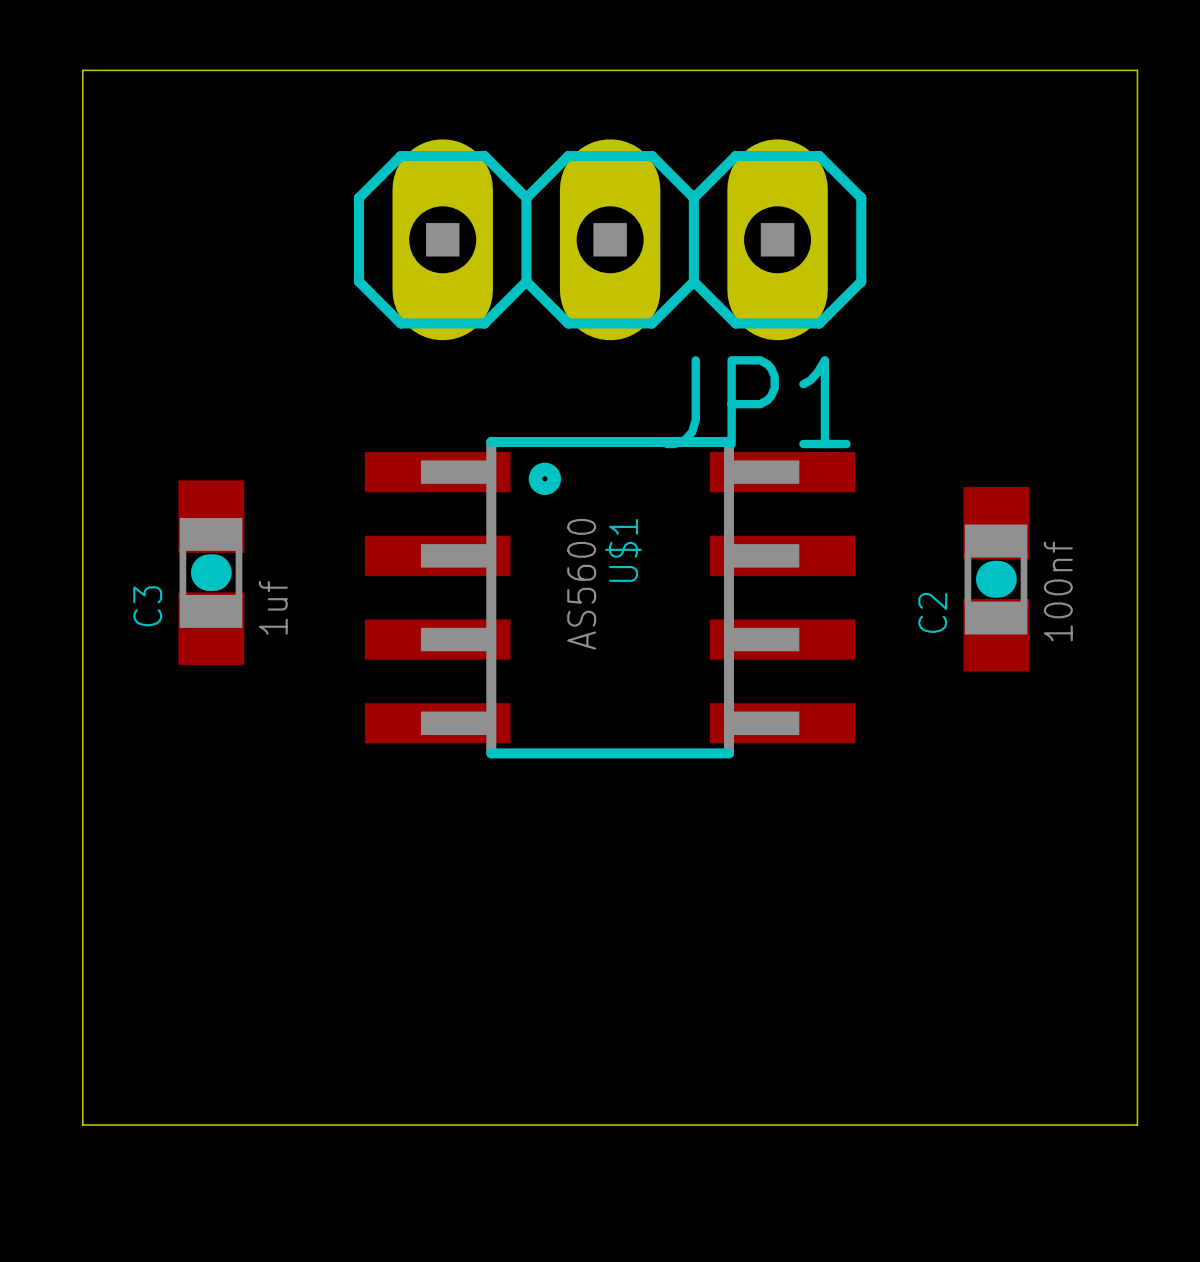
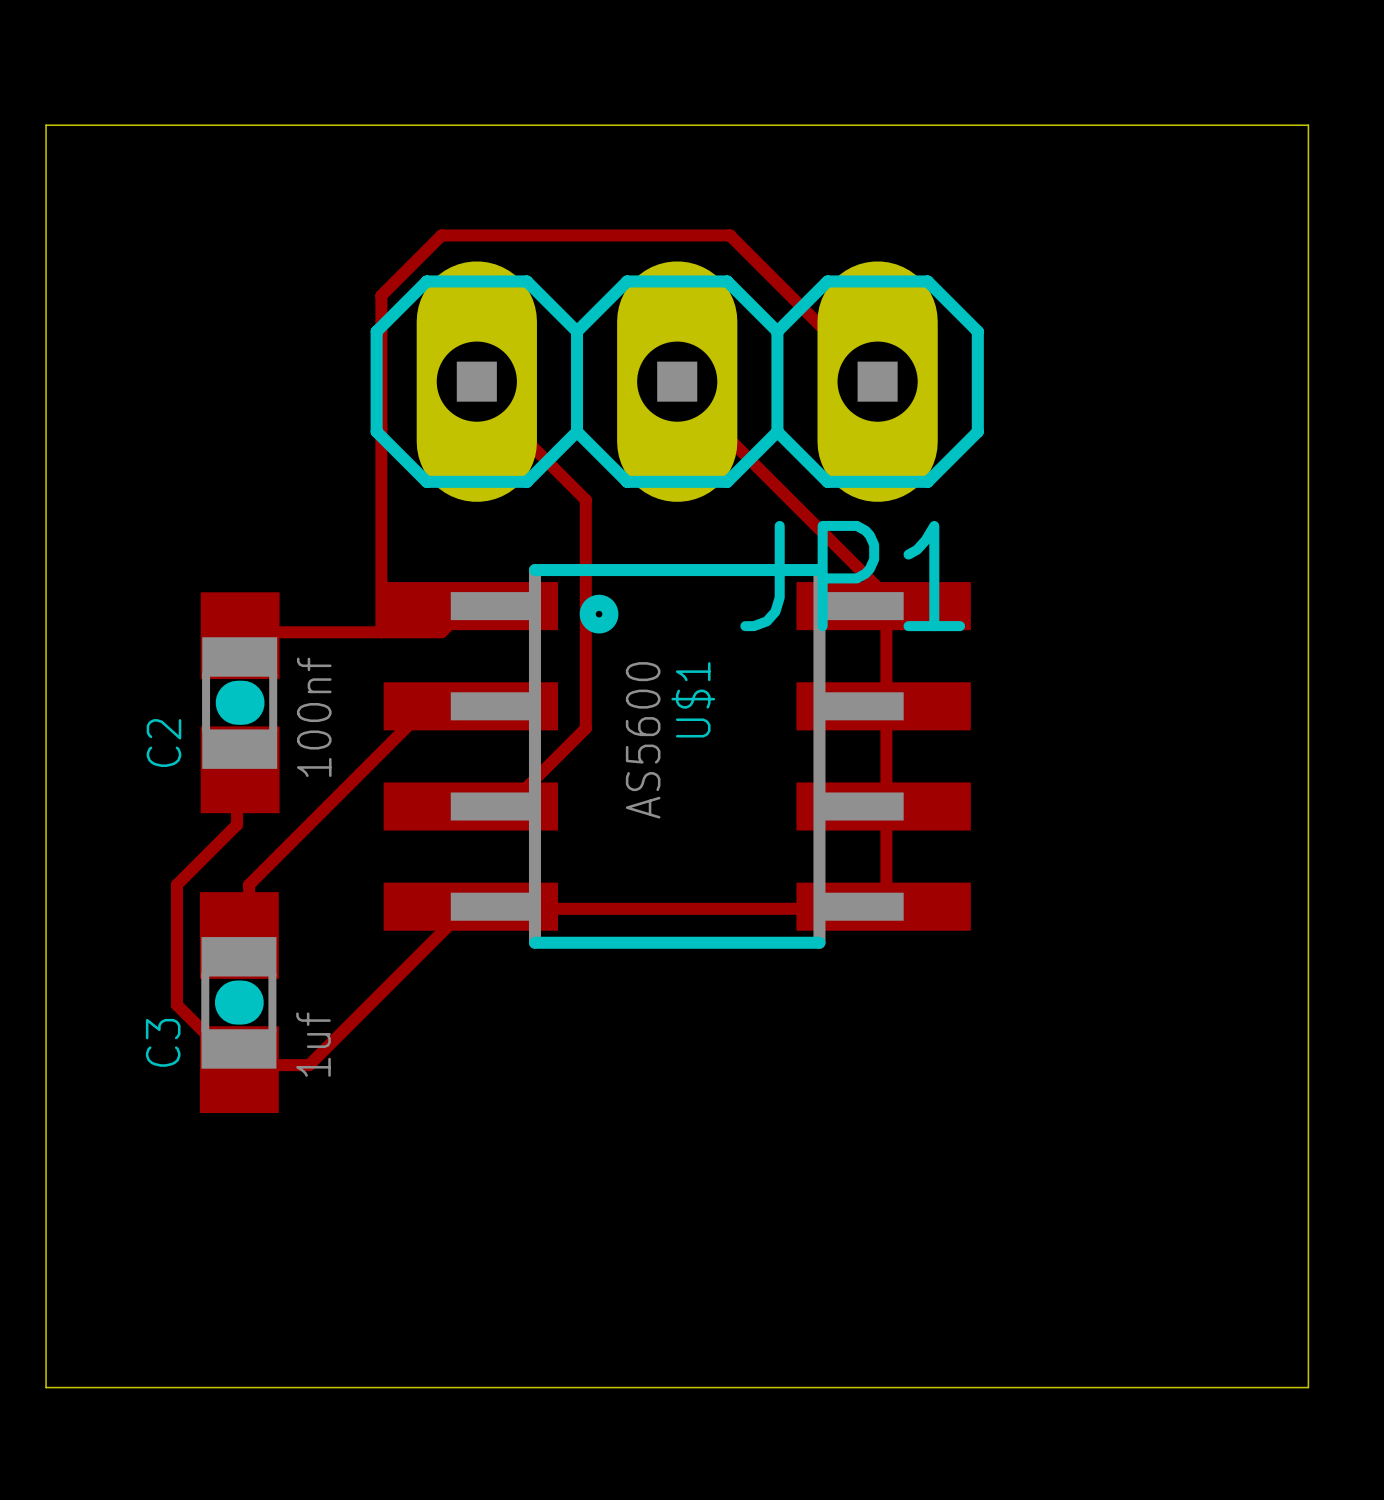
JP1 position: (610, 239) -> (677, 381)
top track: none -> (476, 381) (477, 391) (585, 499) (585, 728) (513, 800) (477, 800) (470, 806)
top track: none -> (677, 381) (681, 391) (886, 596) (883, 606) (886, 608) (886, 704) (883, 706) (886, 716) (886, 800) (883, 806) (886, 812) (886, 896) (883, 906) (874, 908) (477, 908) (470, 906) (465, 908) (309, 1065) (249, 1065) (239, 1069) (237, 1065) (176, 1004) (176, 884) (237, 824) (237, 776) (240, 769)
top track: none -> (877, 381) (730, 235) (441, 235) (381, 295) (381, 632)
top track: none -> (470, 606) (465, 608) (441, 632) (249, 632) (240, 635)
top track: none -> (470, 706) (465, 716) (417, 716) (249, 884) (249, 932) (239, 935)
C3 position: (211, 572) -> (239, 1002)
C2 position: (996, 579) -> (240, 702)

